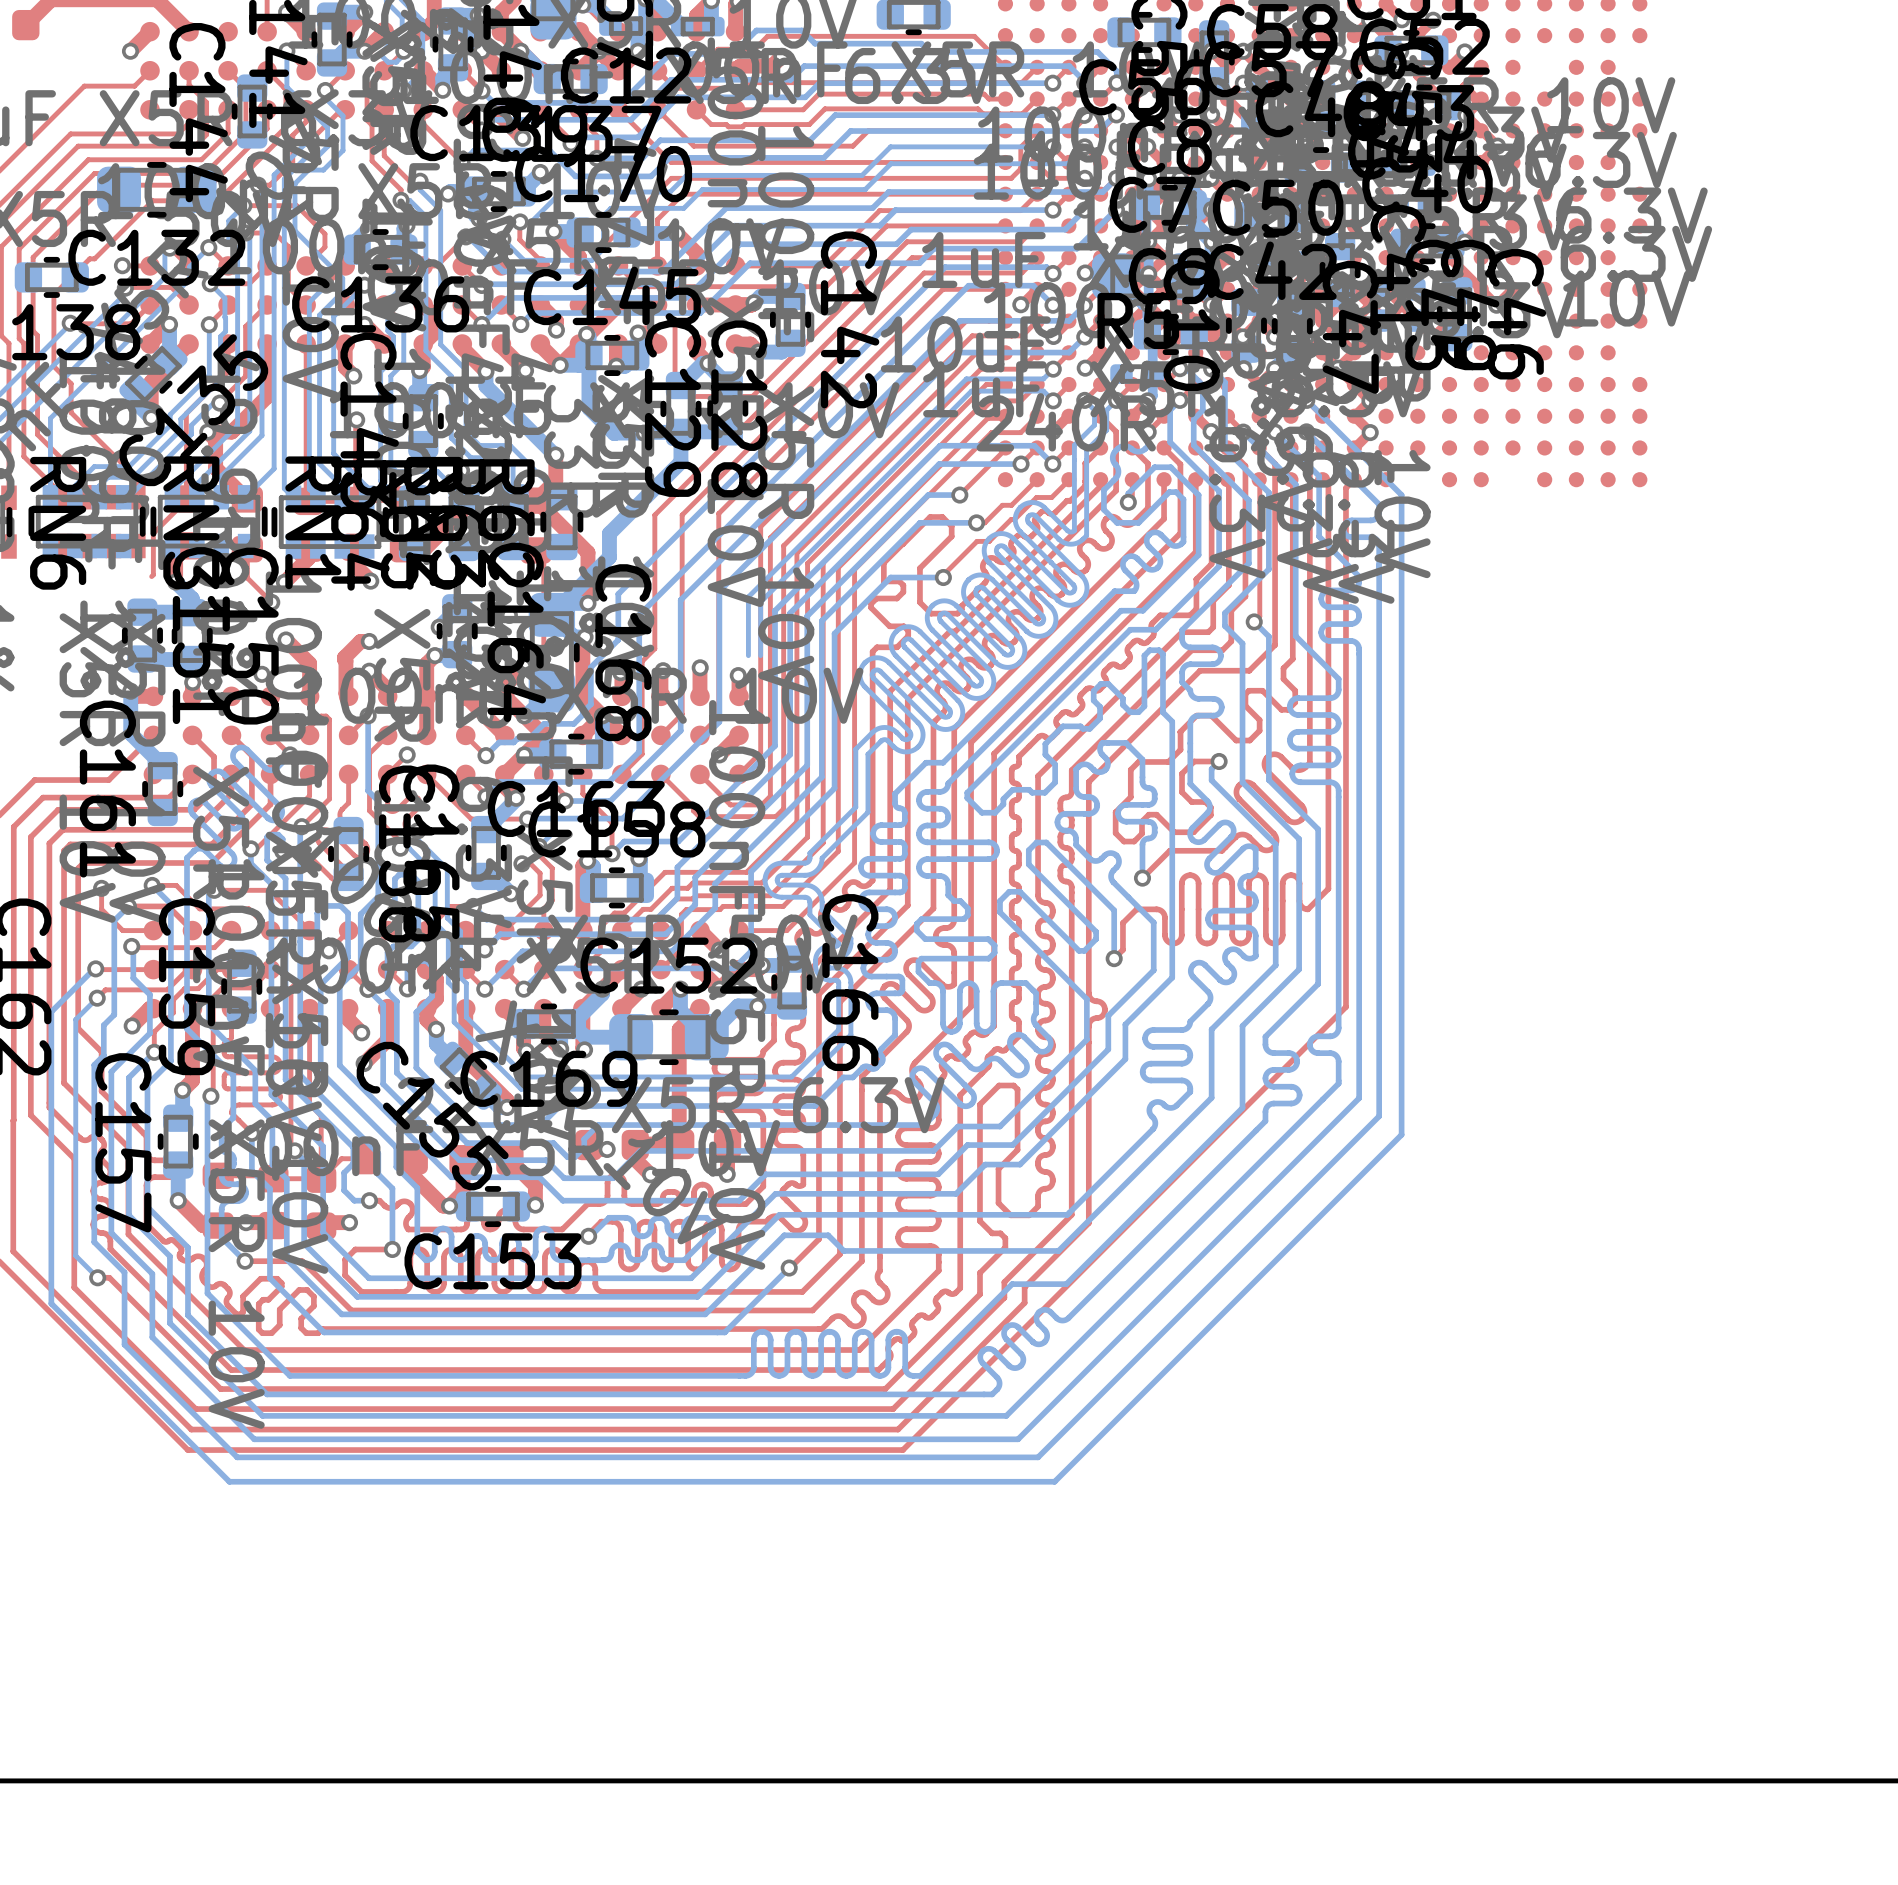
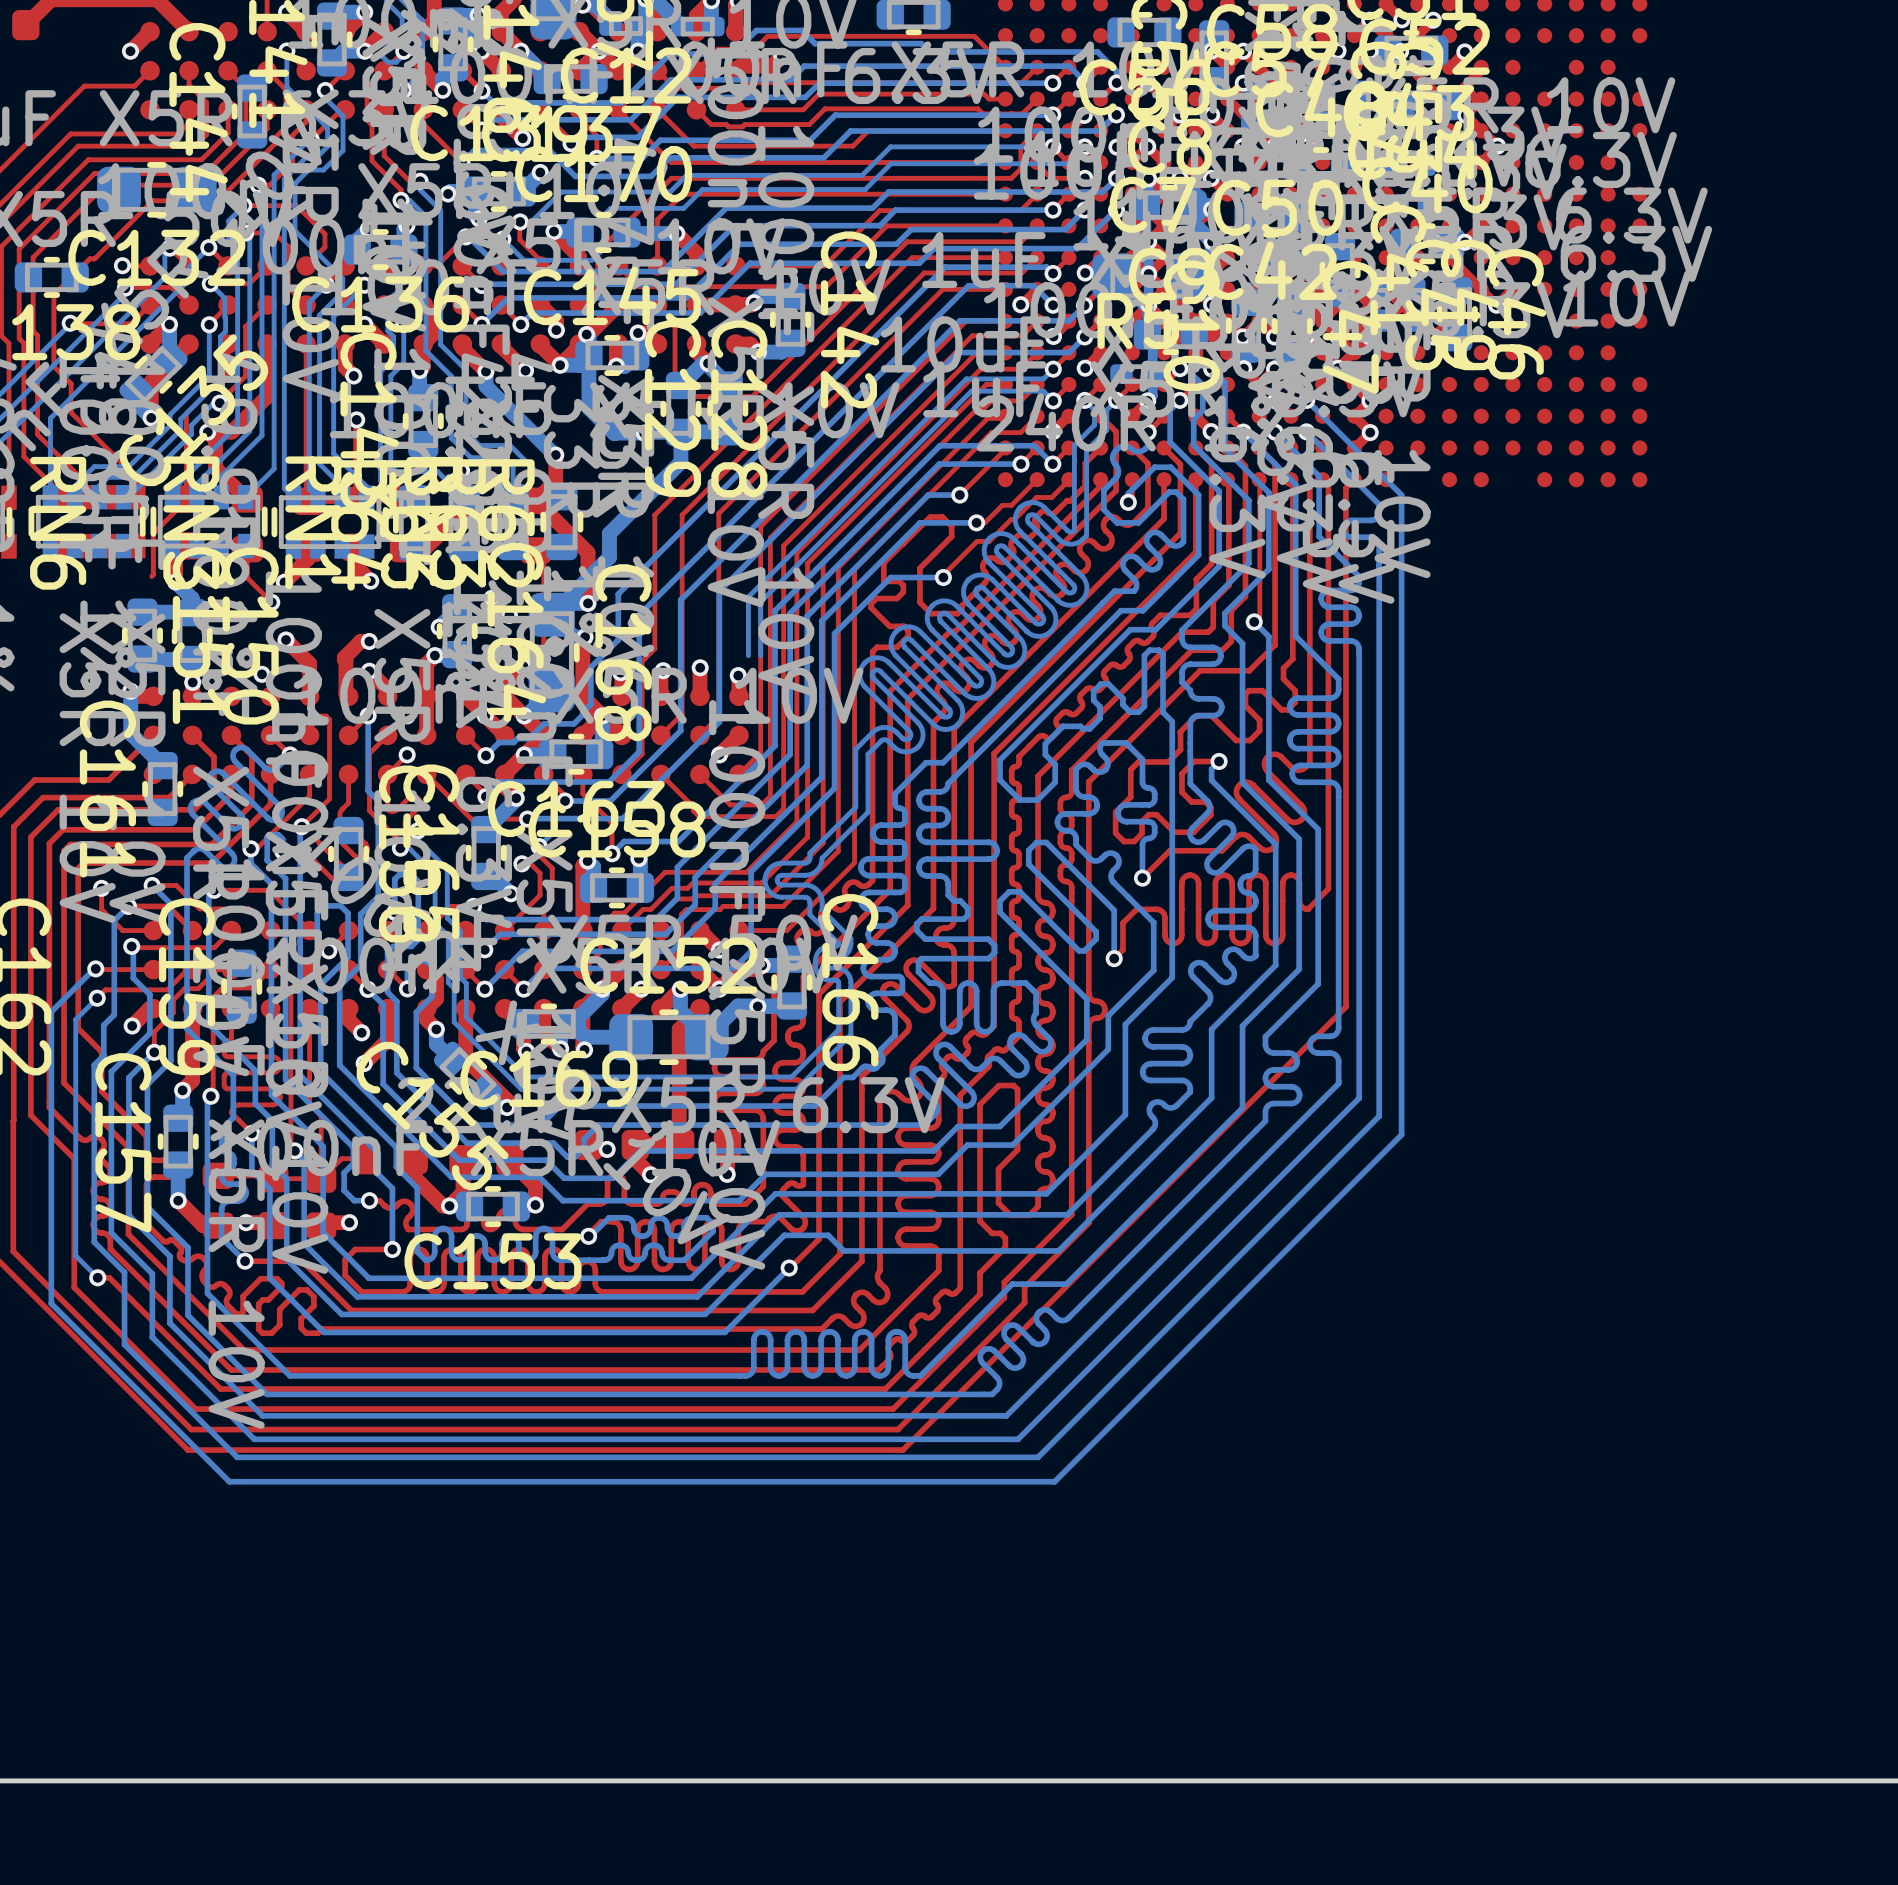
bottom track: (999, 760) (967, 792) (967, 798) (981, 812) (995, 812) (1003, 804) (1003, 799) (1012, 789) (1029, 789) (1032, 792) (1044, 792) -> (999, 760) (999, 780) (1020, 800) (1037, 800) (1044, 792)
bottom track: (1125, 1059) (1020, 1164) (985, 1164) (956, 1193) -> (1125, 1059) (1125, 1114) (1046, 1193) (956, 1193)

